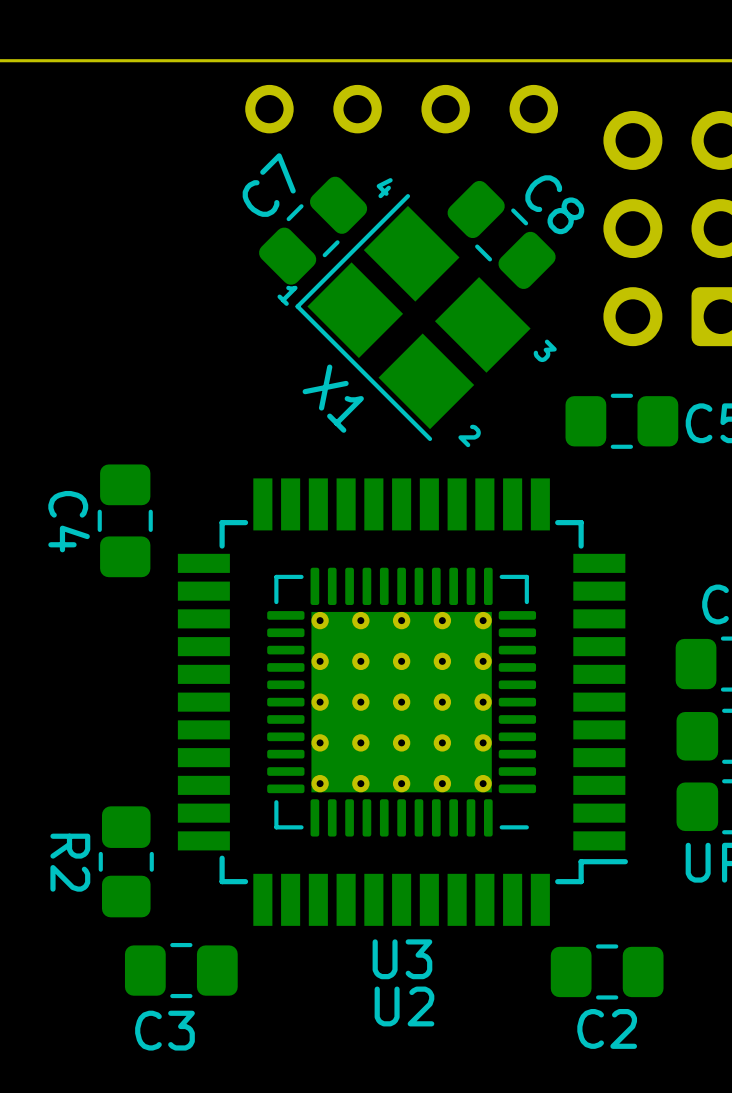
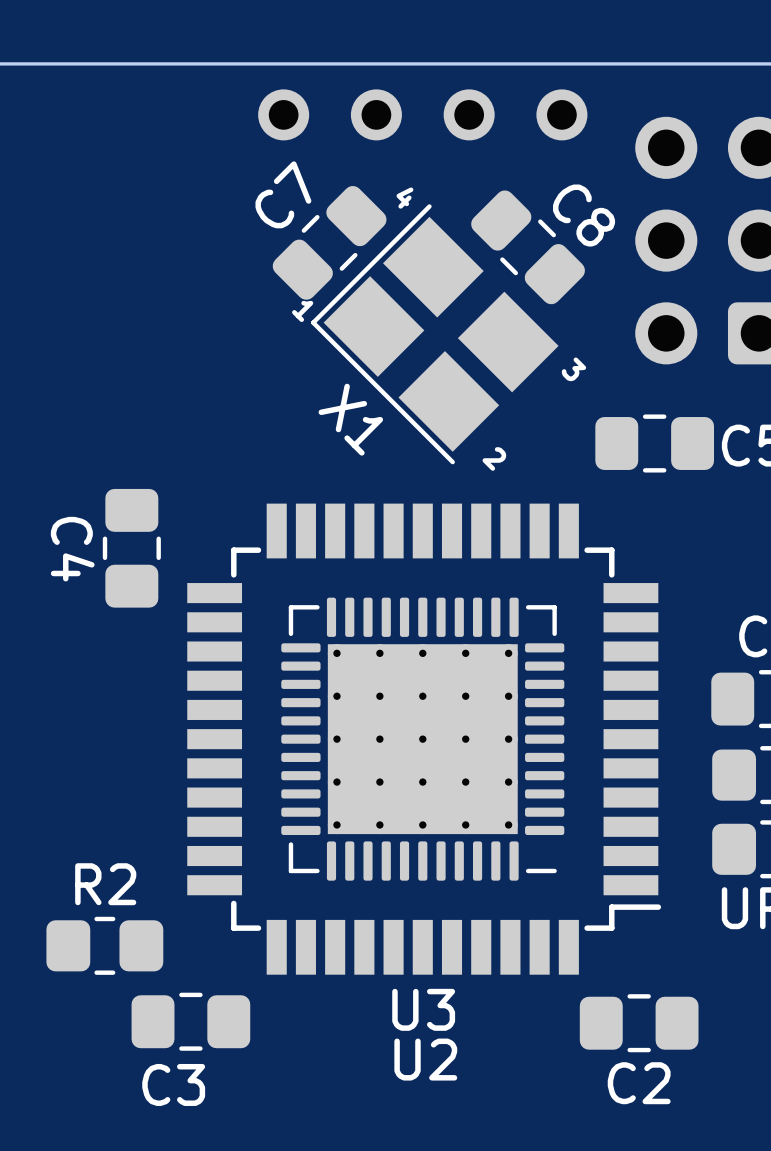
R2 rotation: 0° (126, 861) -> 90° clockwise (104, 945)

